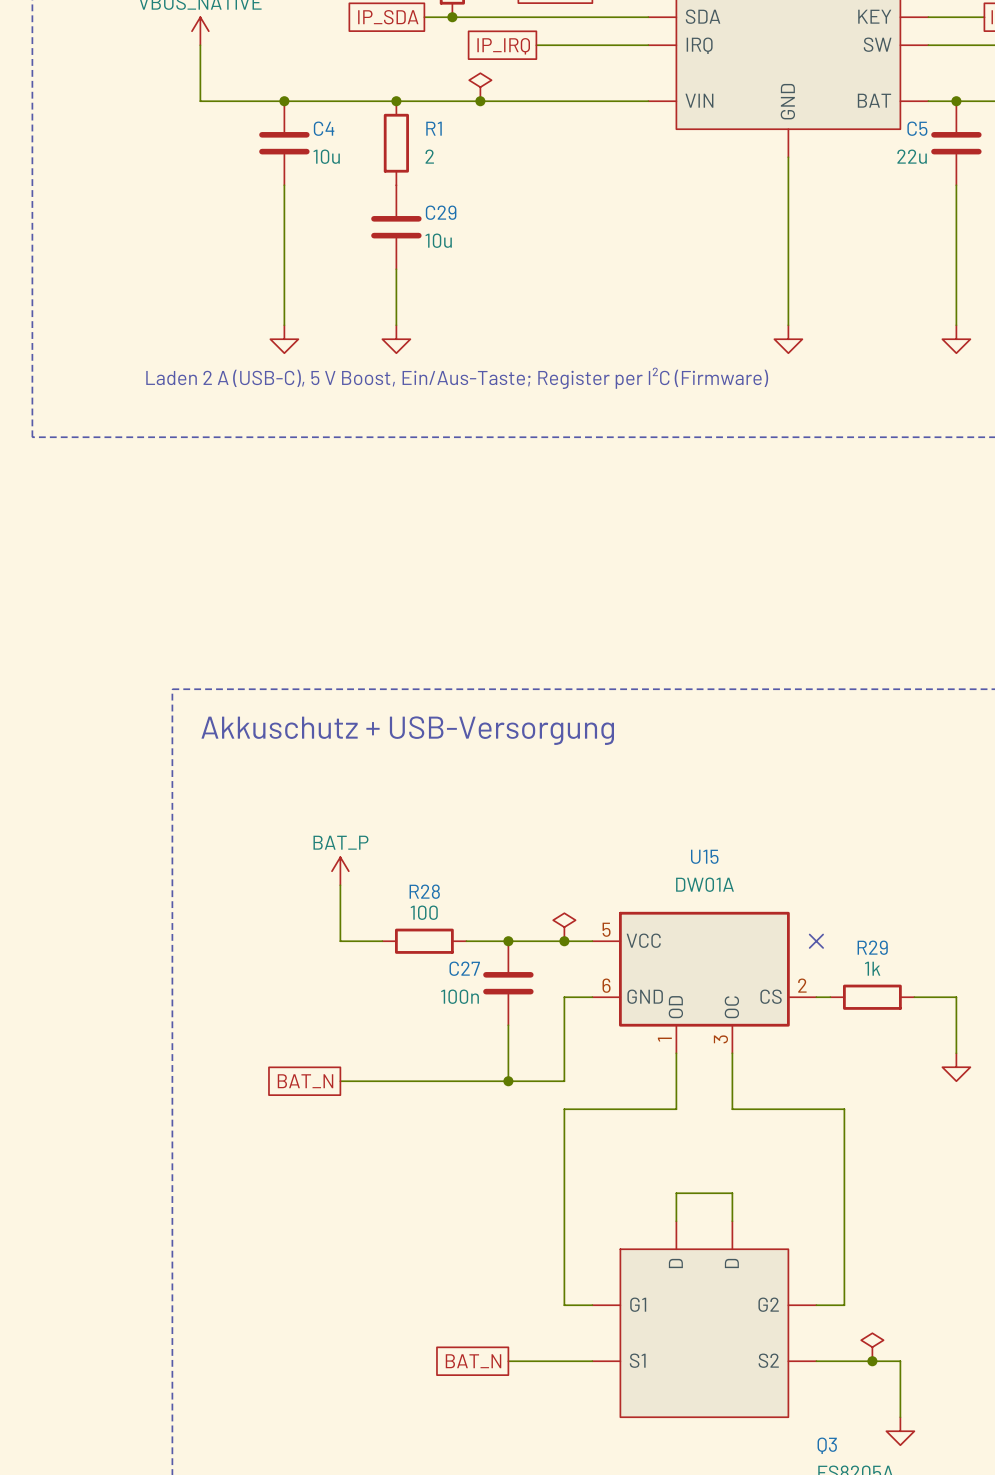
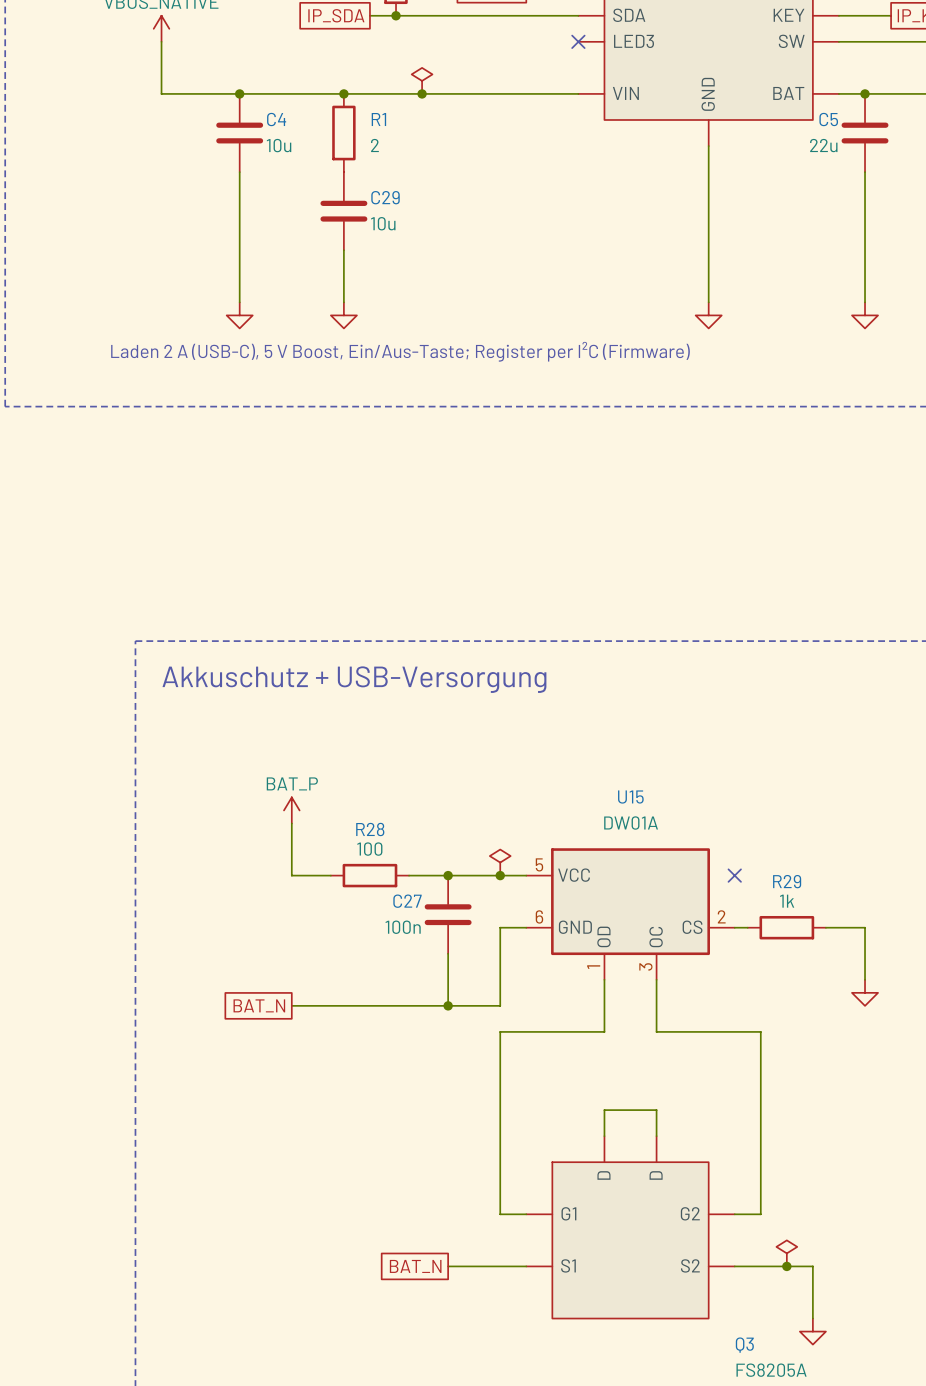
wire: (536, 45) (648, 45) -> none
no-connect mark: none -> (578, 41)
part pin name: IRQ (699, 45) -> LED3 (634, 41)
global label: IP_IRQ (503, 46) -> none

